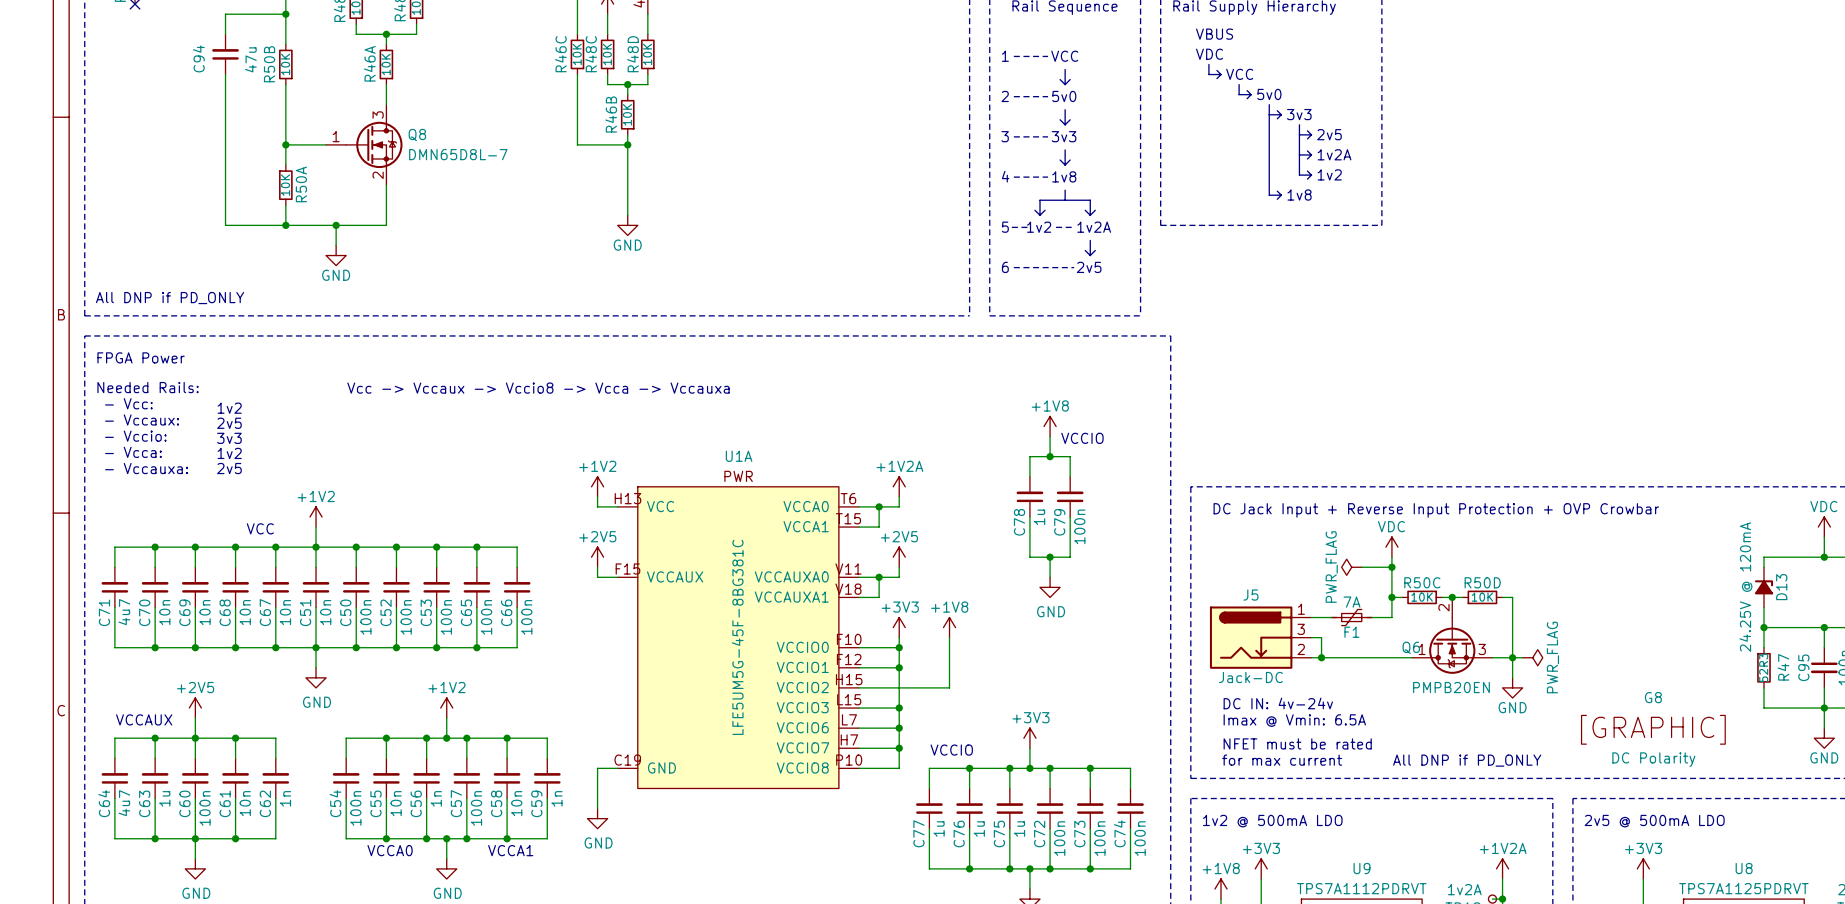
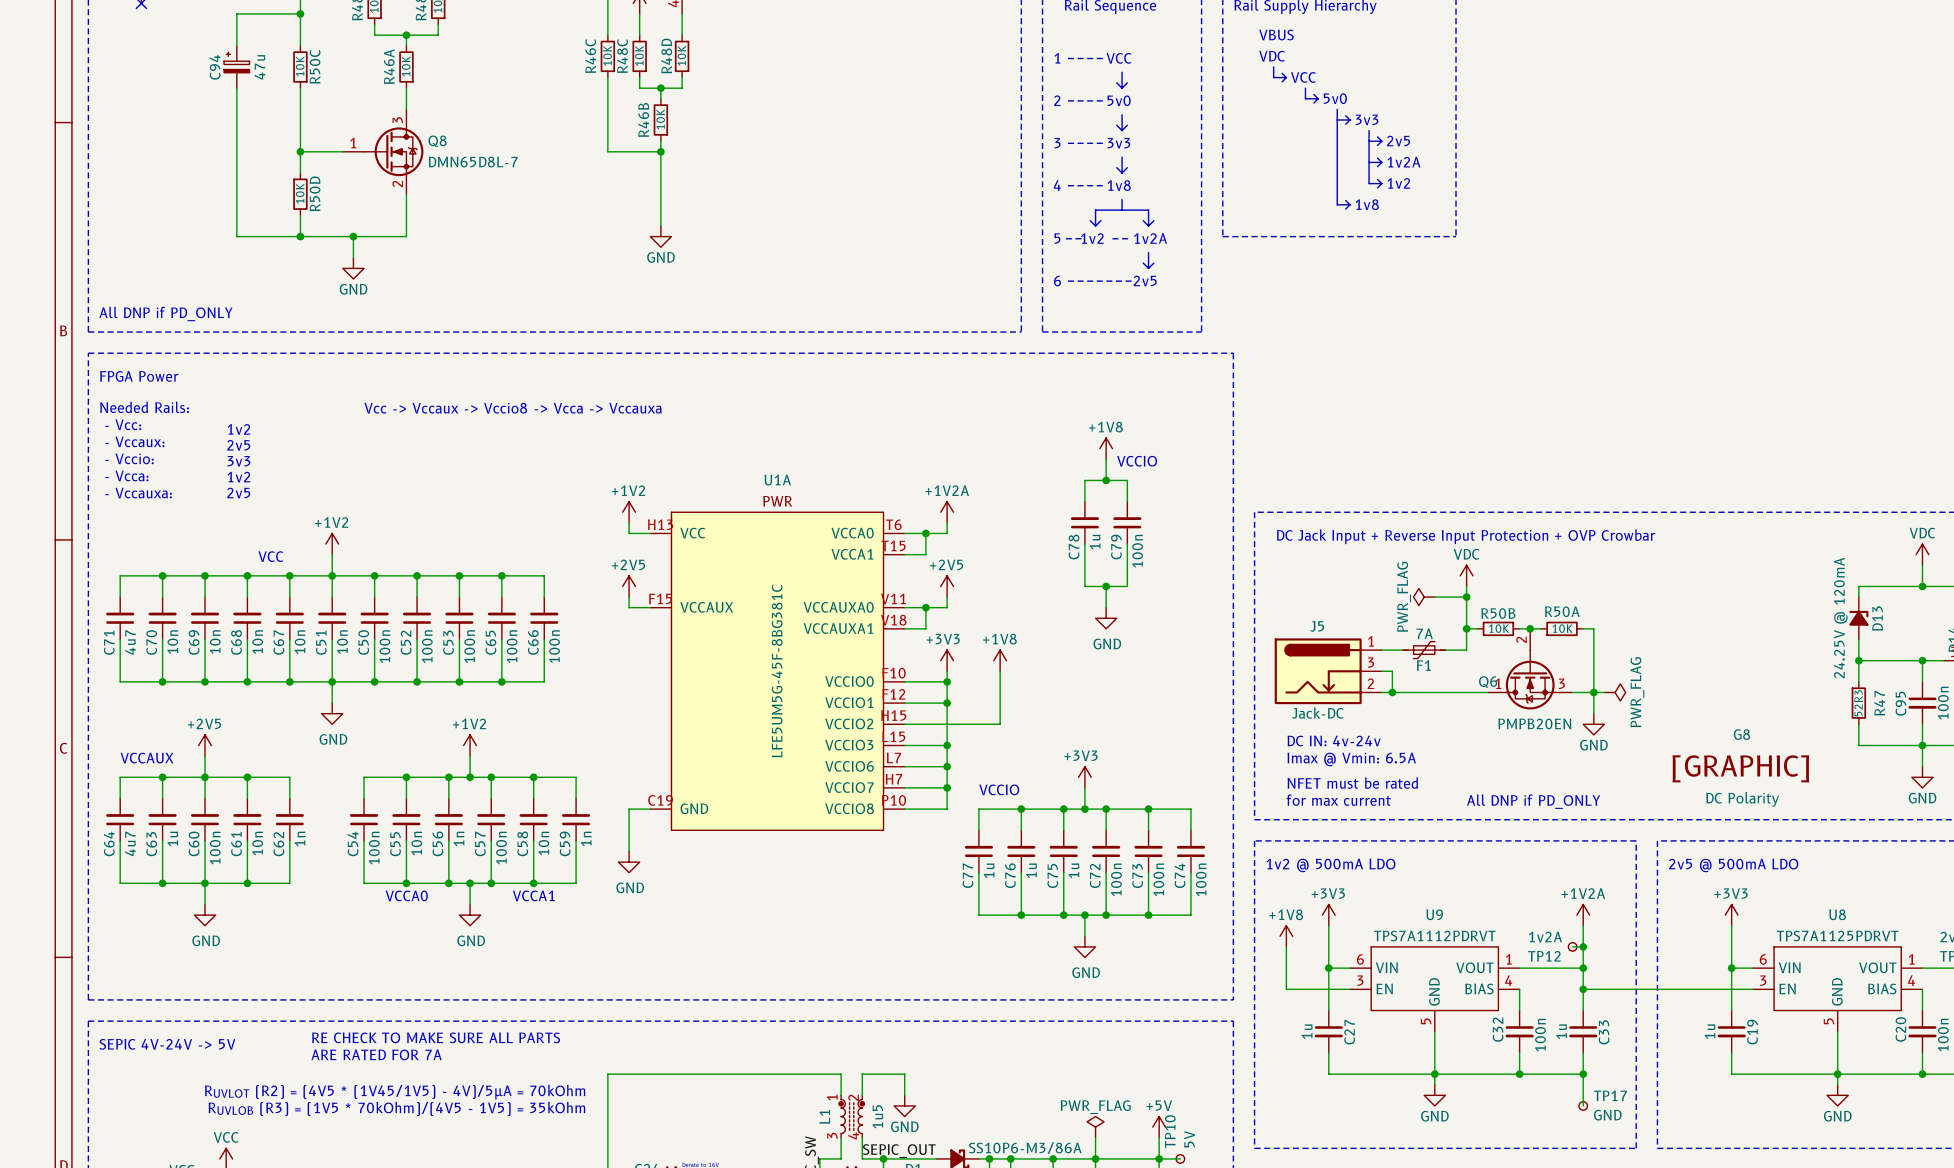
C94 symbol: [212, 34, 239, 75] -> [224, 45, 250, 89]
R50B name: R50B (269, 64) -> R50C (315, 66)
R50A name: R50A (301, 184) -> R50D (315, 193)
R50C name: R50C (1422, 582) -> R50B (1498, 613)
R50D name: R50D (1482, 582) -> R50A (1562, 611)

